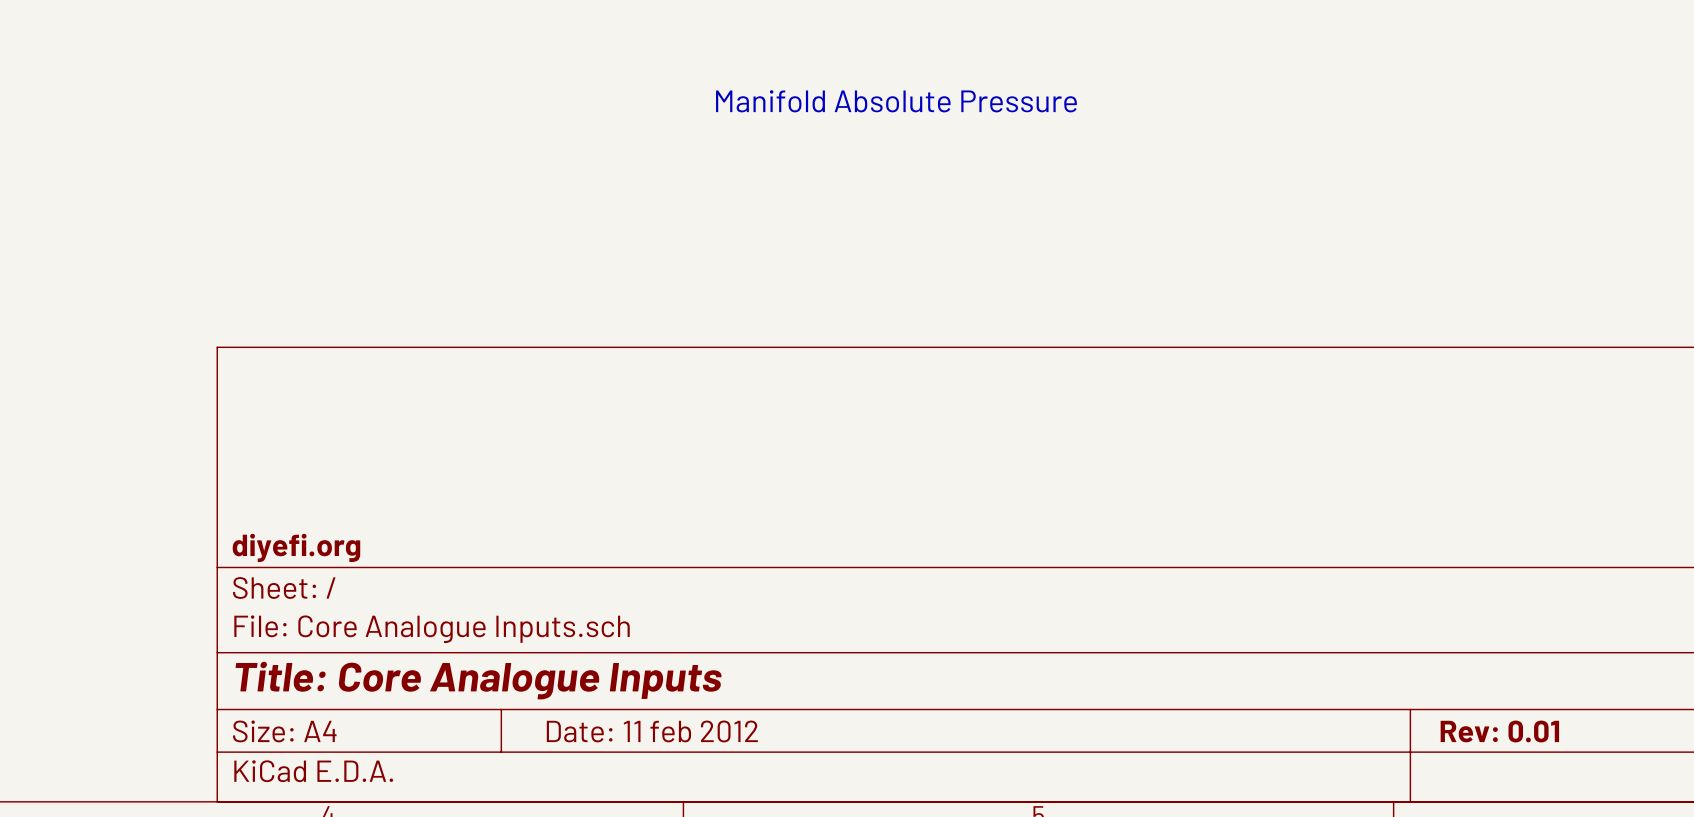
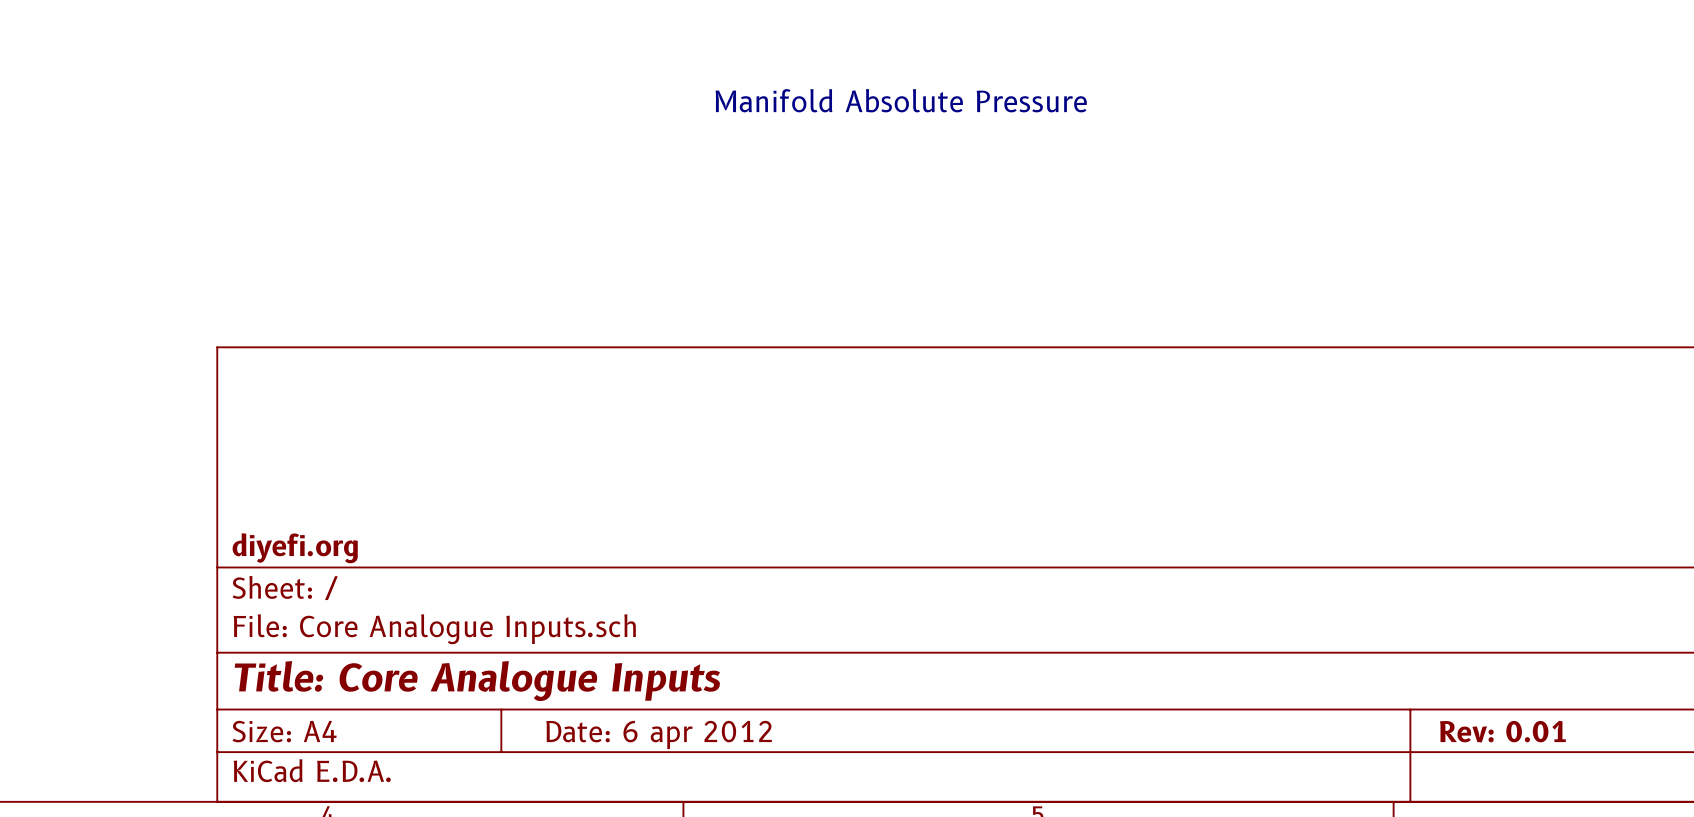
title block: Date: 11 feb 2012 (652, 731) -> Date: 6 apr 2012 (659, 734)

